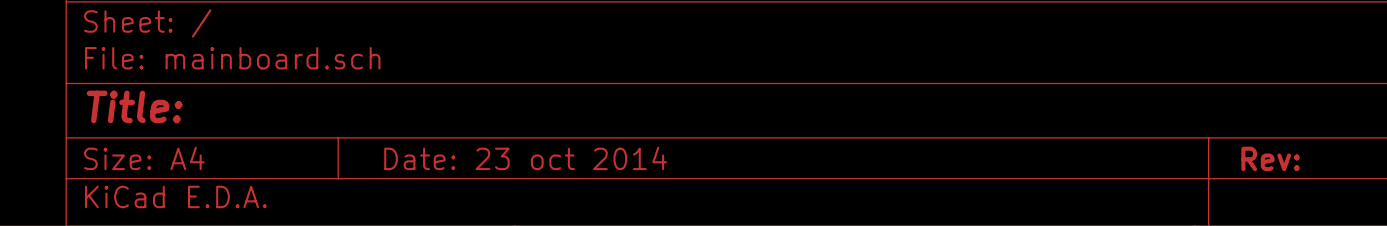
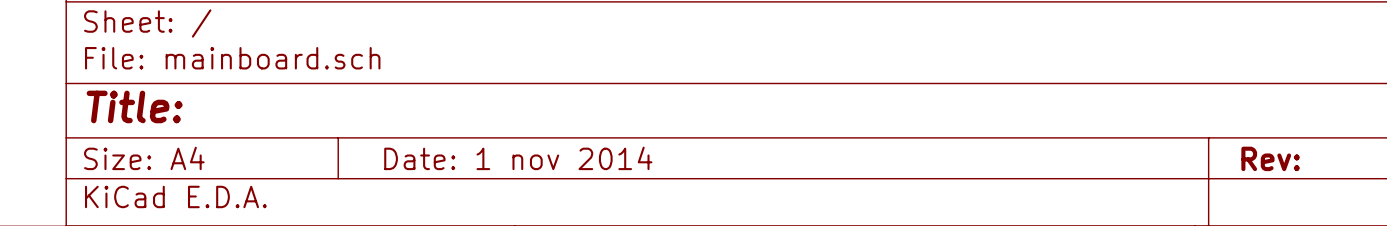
title block: Date: 23 oct 2014 (525, 158) -> Date: 1 nov 2014 (518, 158)

